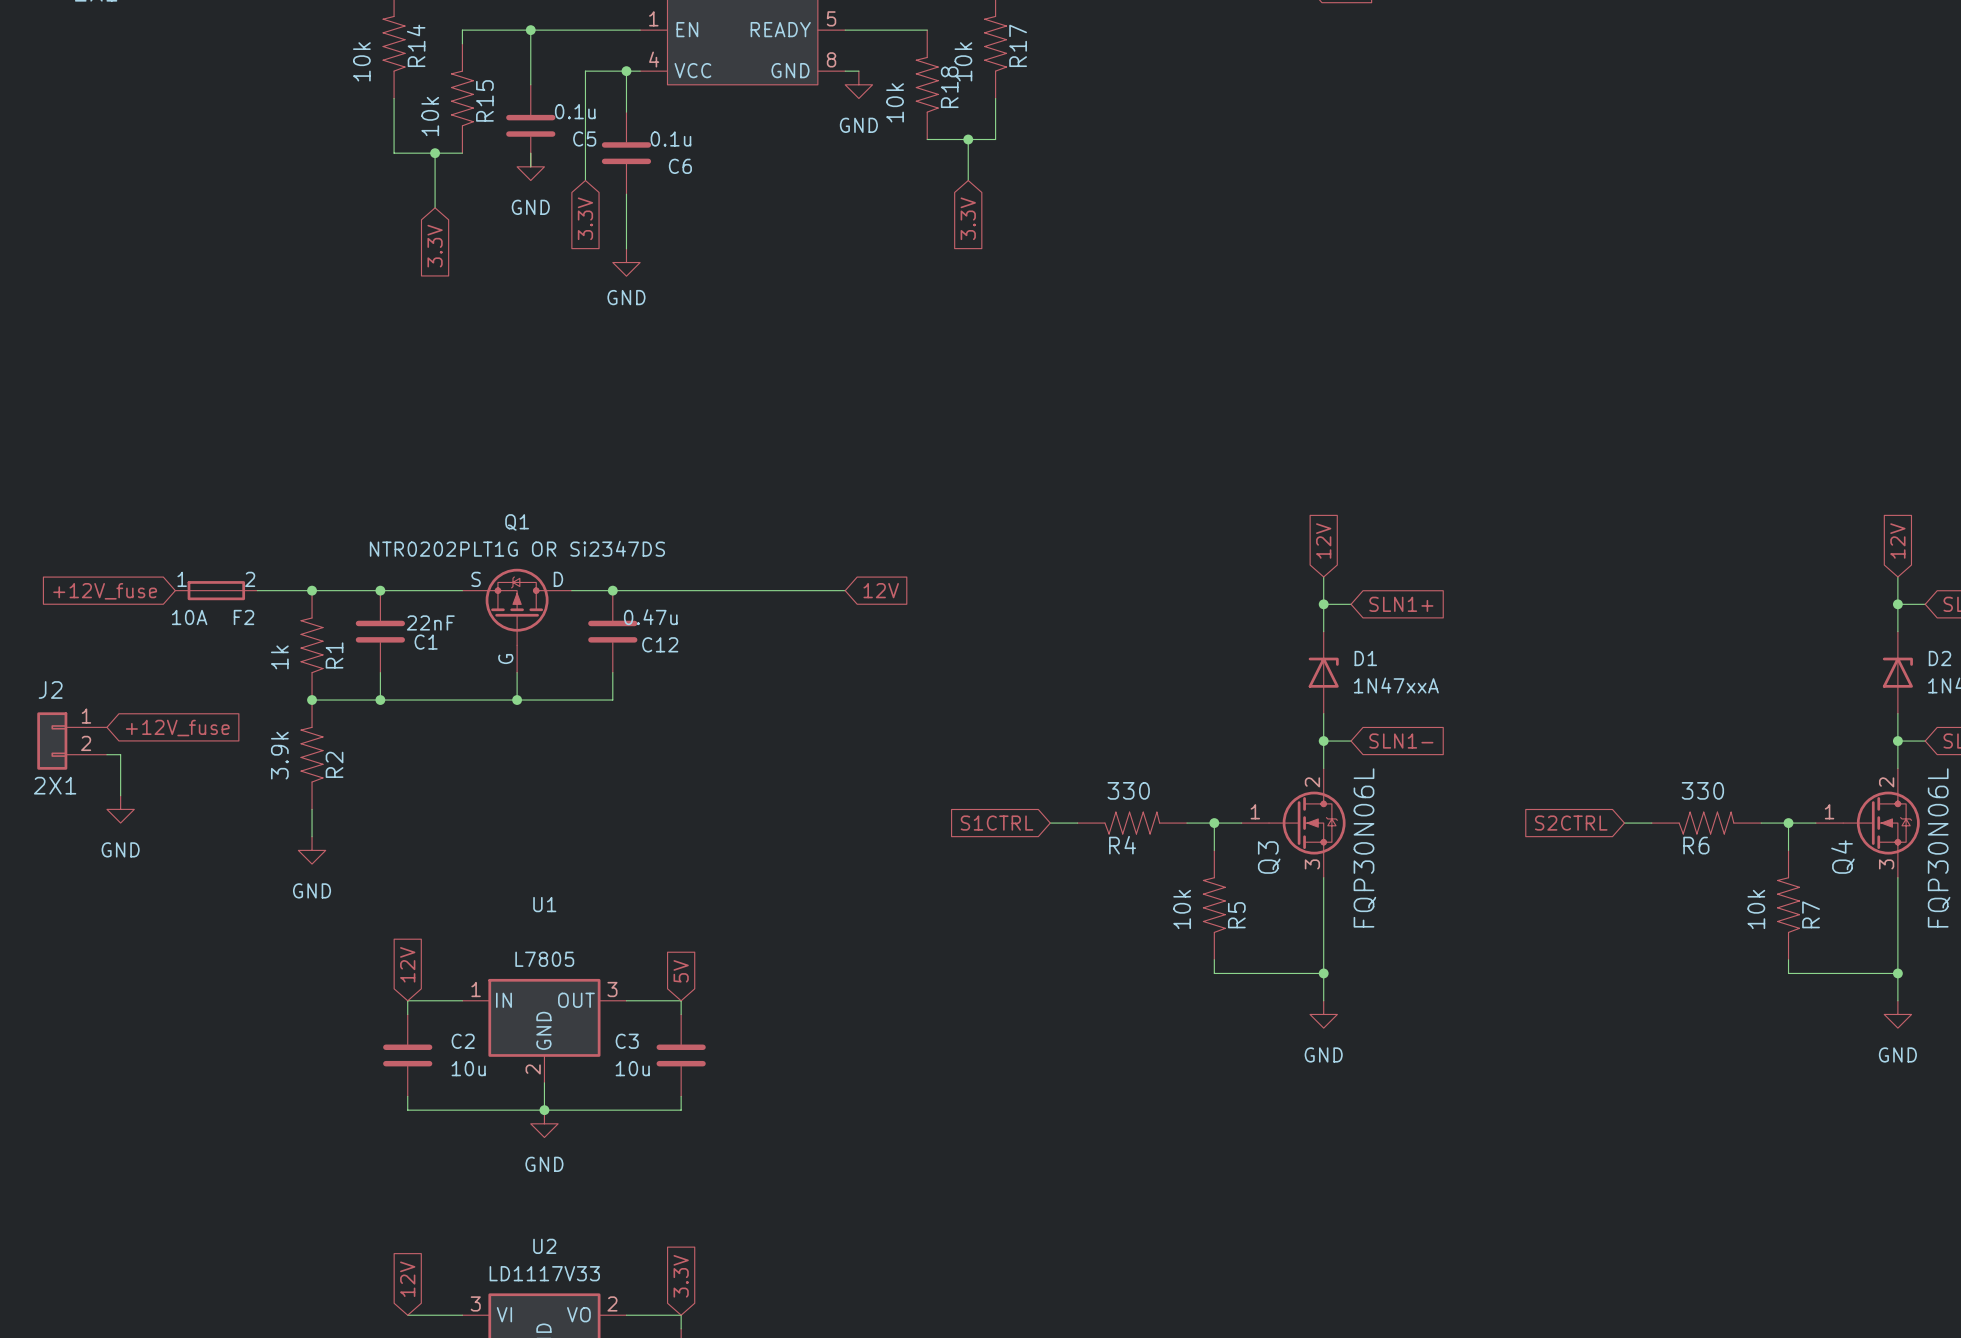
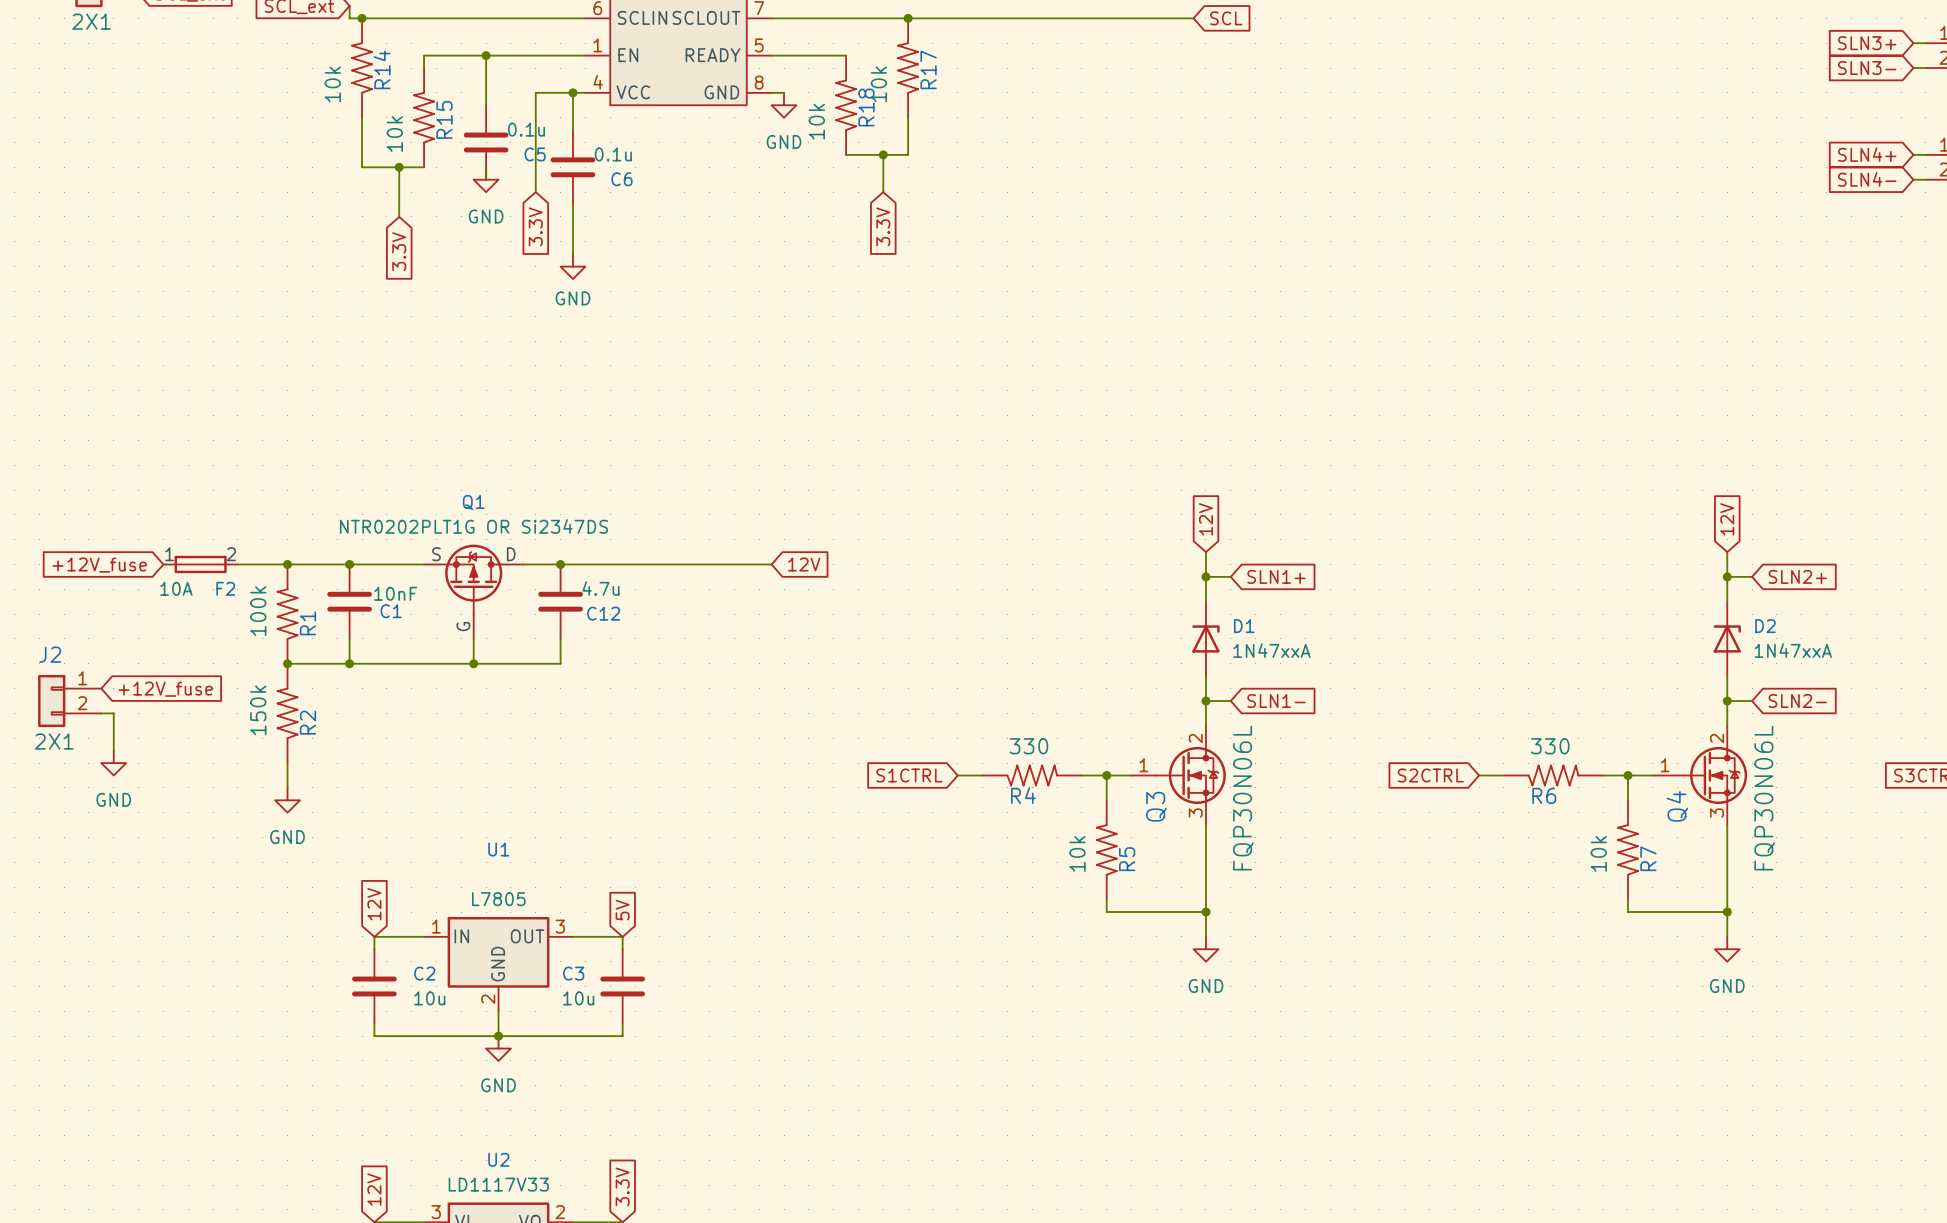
C12 value: 0.47u (650, 617) -> 4.7u (600, 588)
C1 value: 22nF (430, 622) -> 10nF (395, 593)
R1 value: 1k (279, 657) -> 100k (258, 611)
R2 value: 3.9k (279, 755) -> 150k (258, 710)

